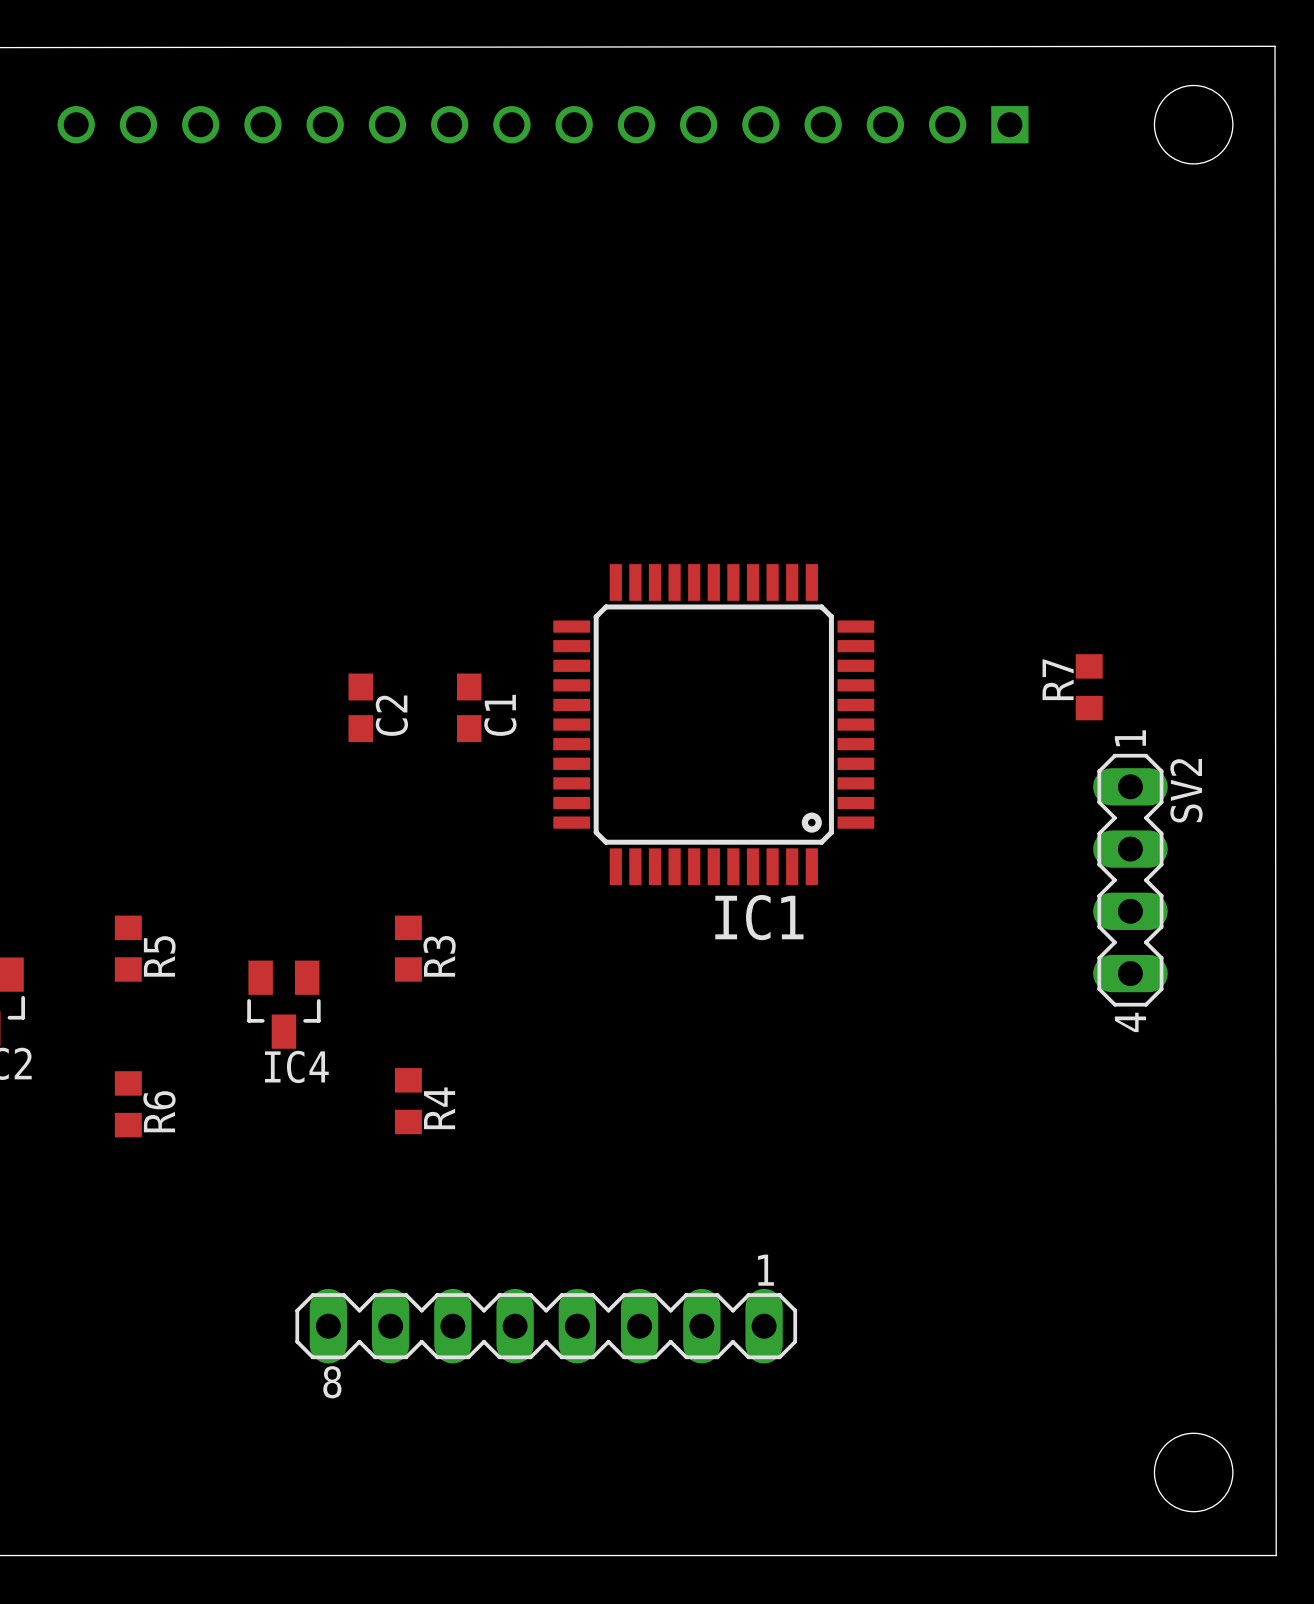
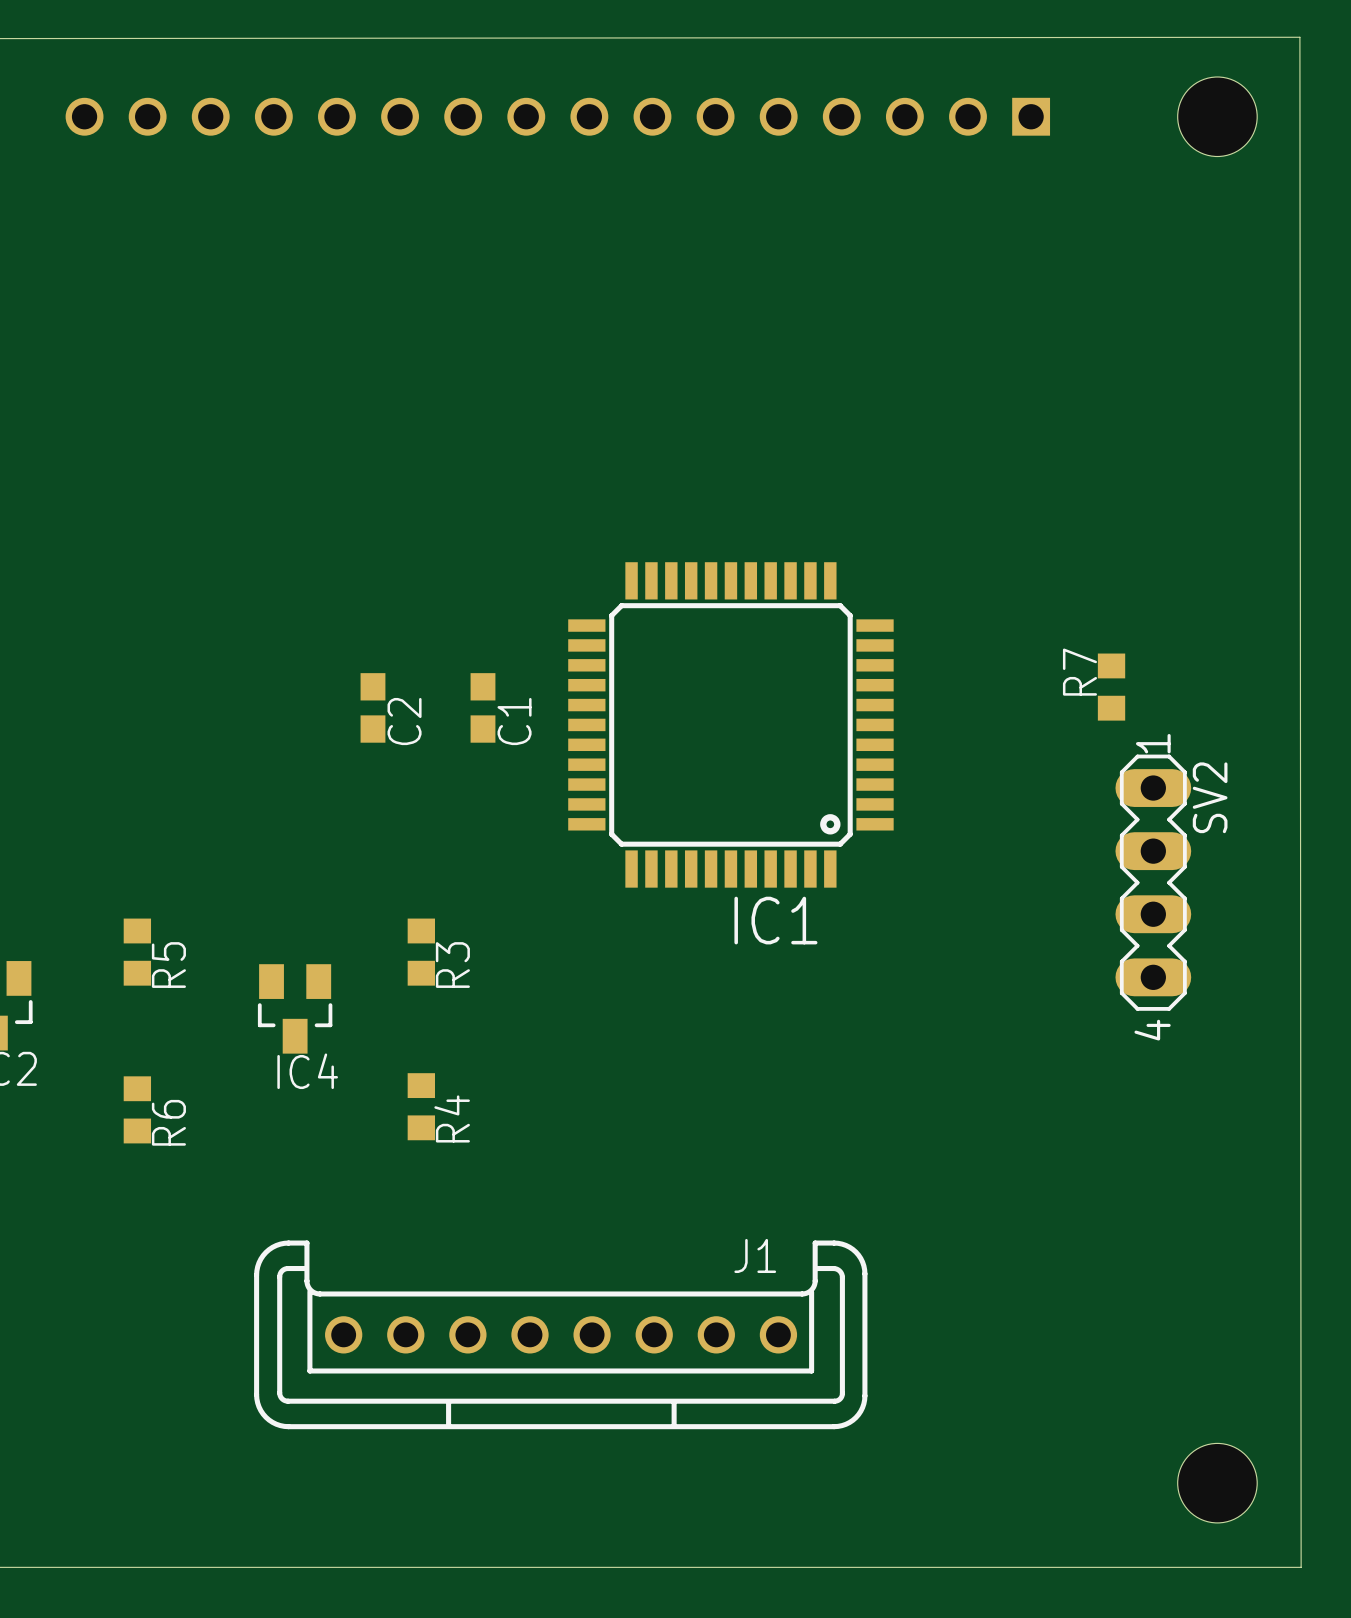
J1: none -> (560, 1334)
part: (546, 1326) -> none

